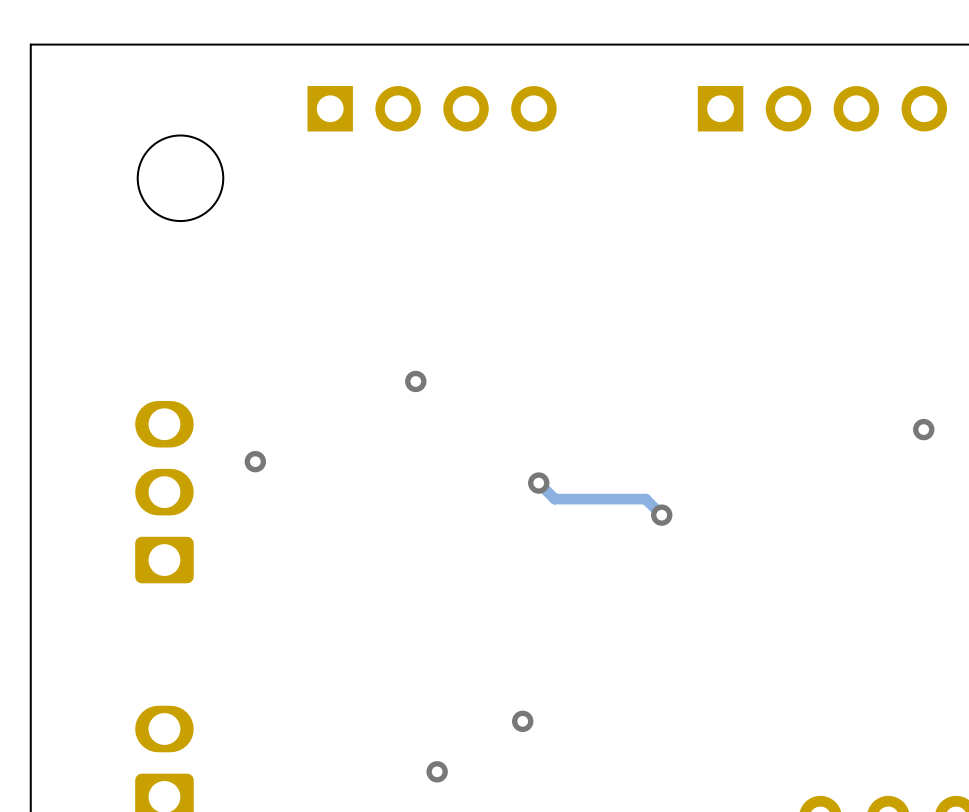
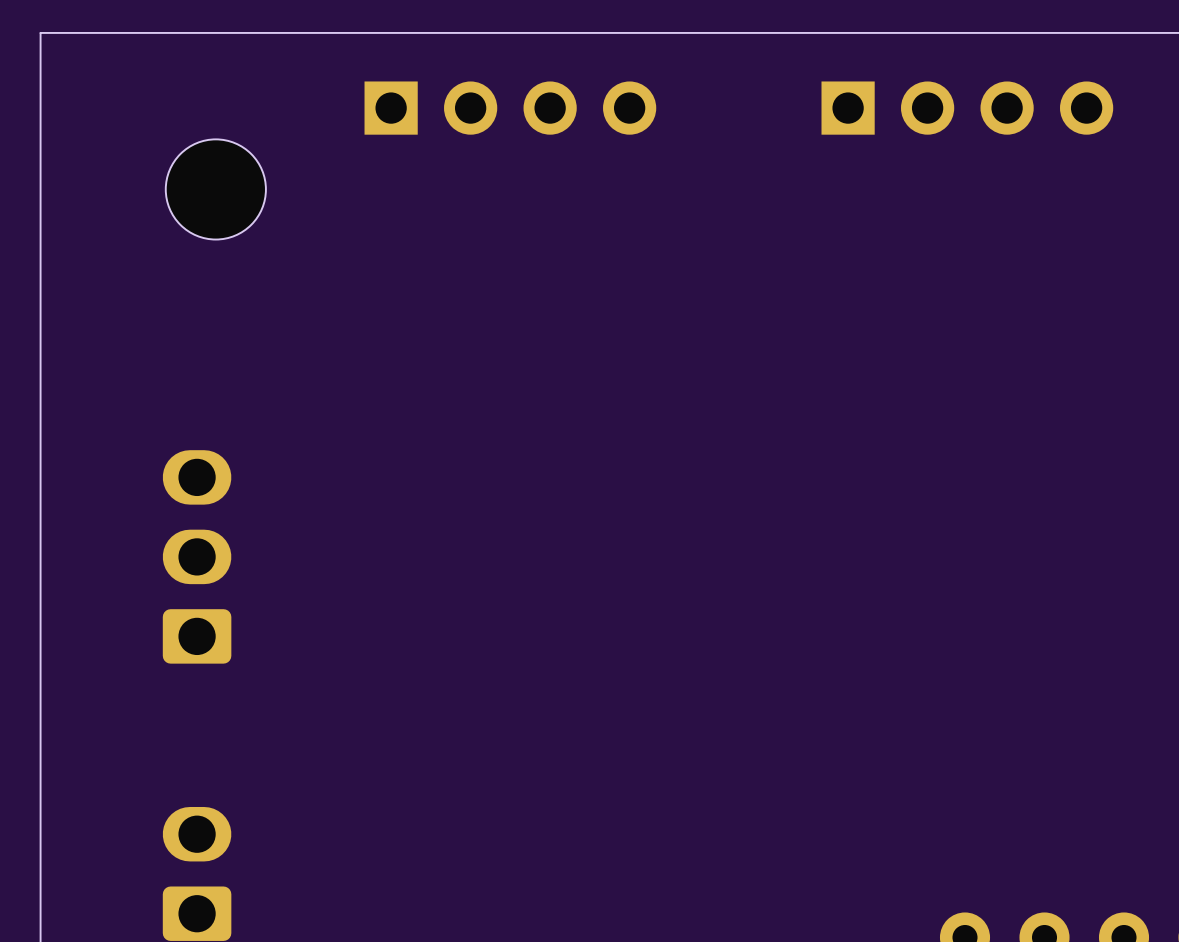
via: (415, 381) -> none
via: (923, 429) -> none
via: (255, 461) -> none
track: (538, 483) (554, 499) (645, 499) (661, 515) -> none
via: (538, 483) -> none
via: (661, 515) -> none
via: (522, 721) -> none
via: (437, 771) -> none

